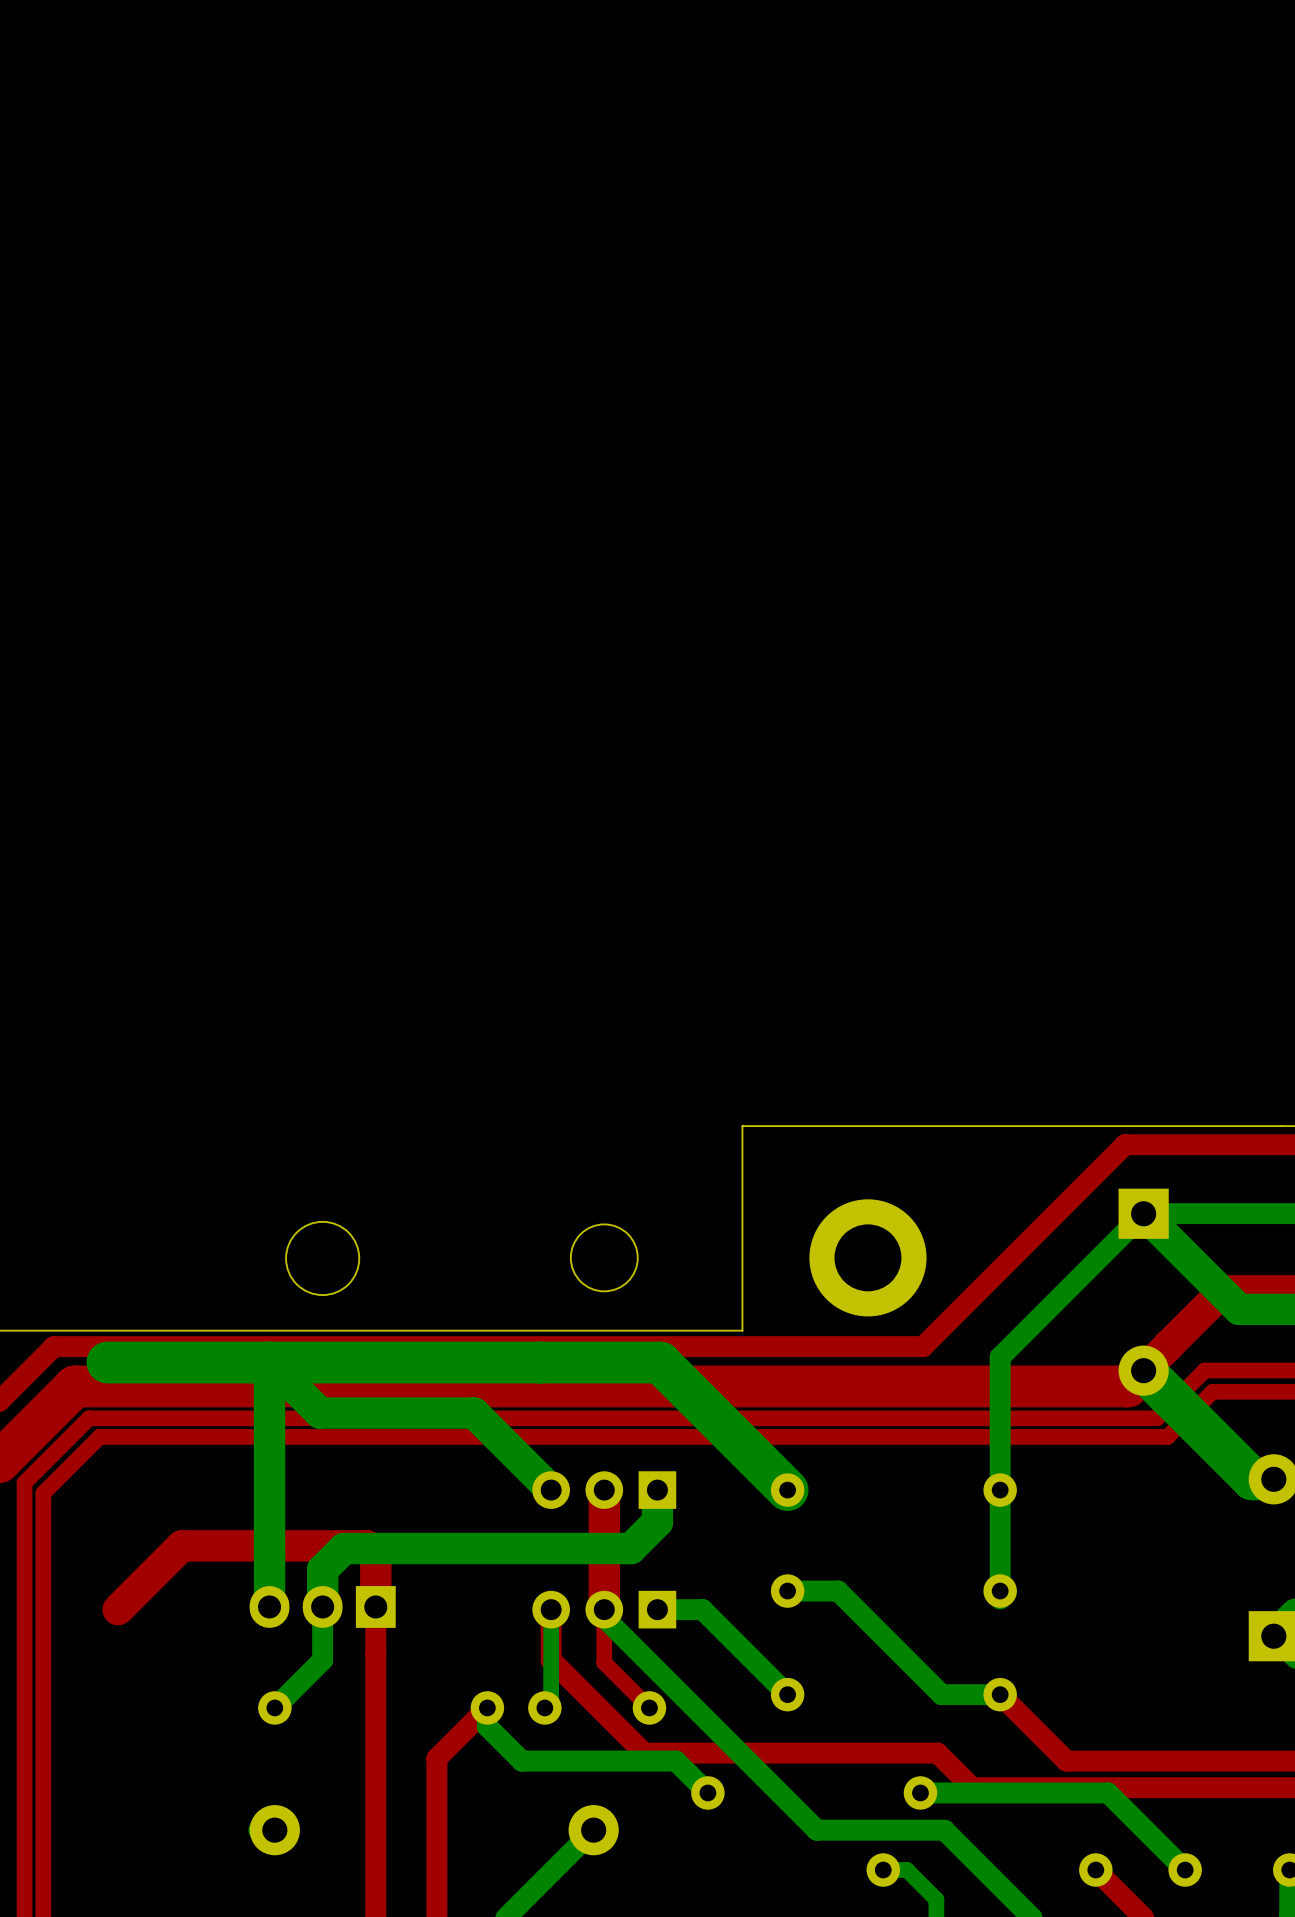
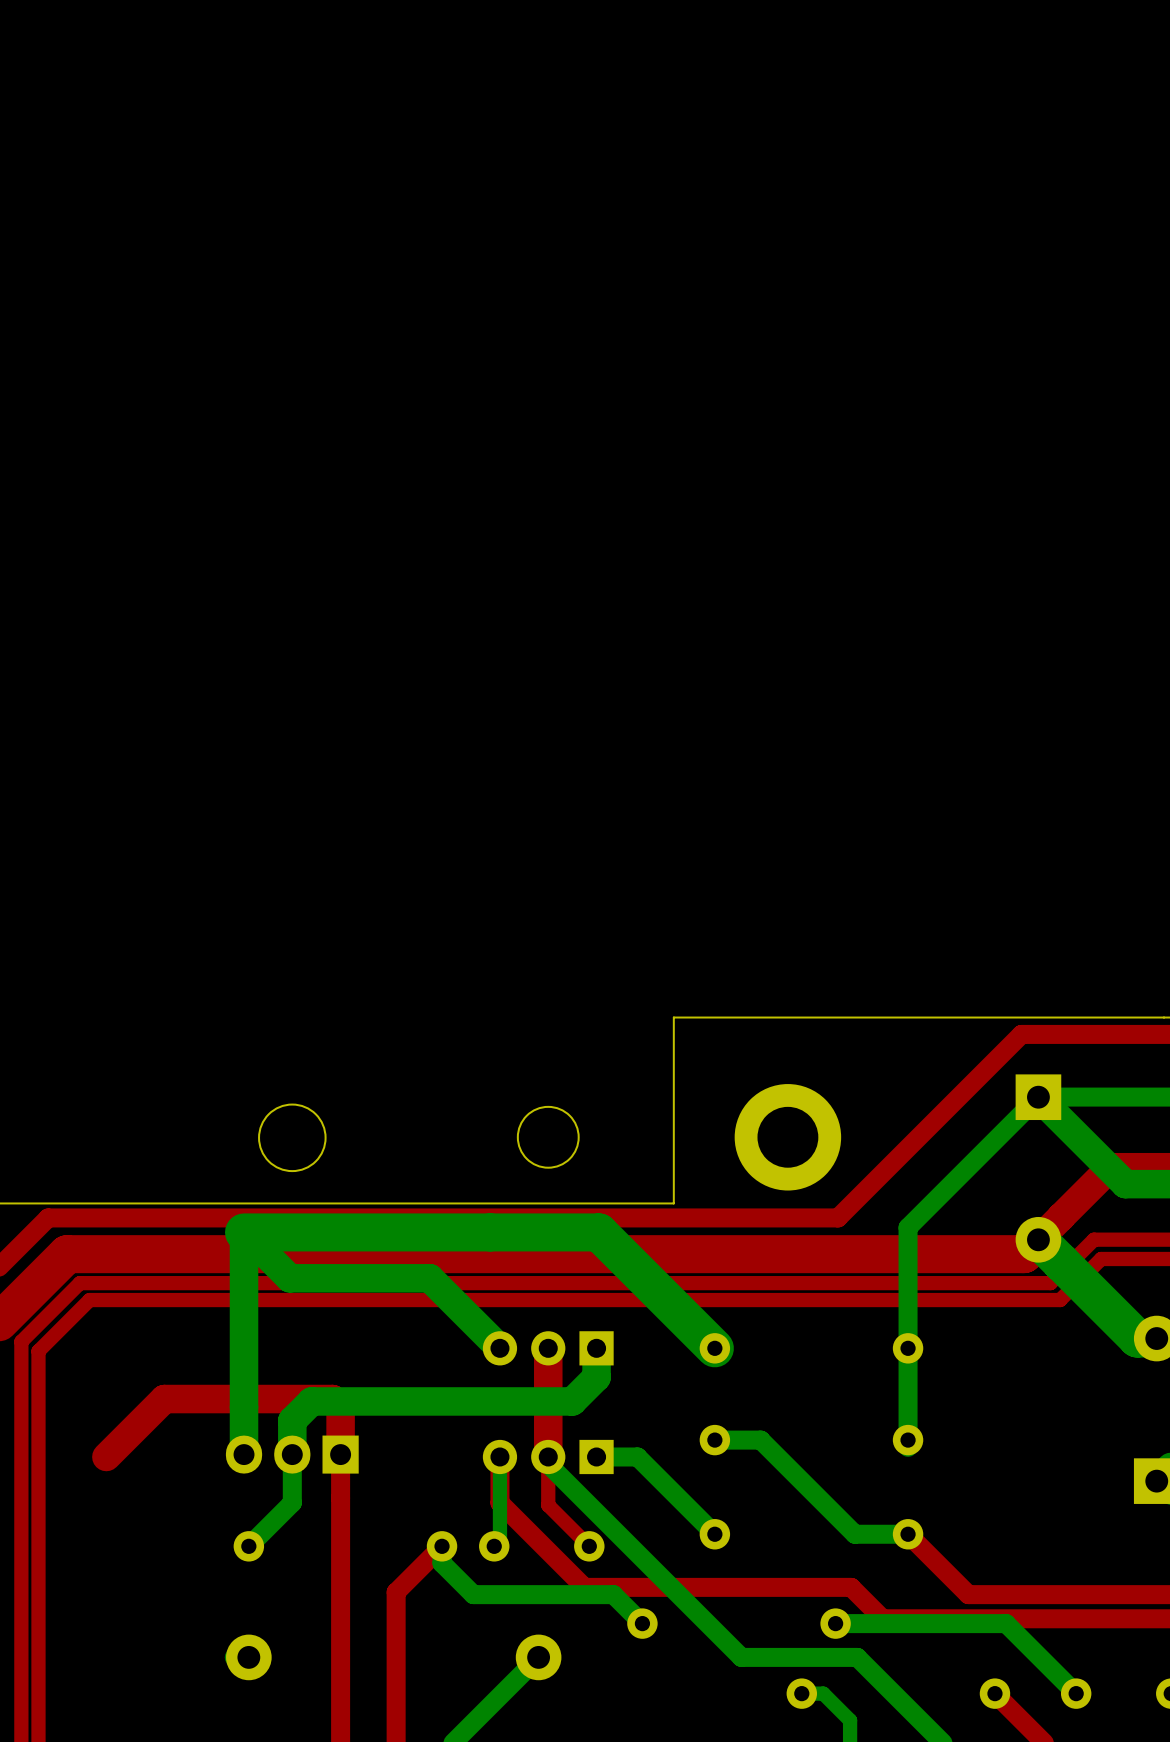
bottom track: (269, 1362) (107, 1362) -> none

